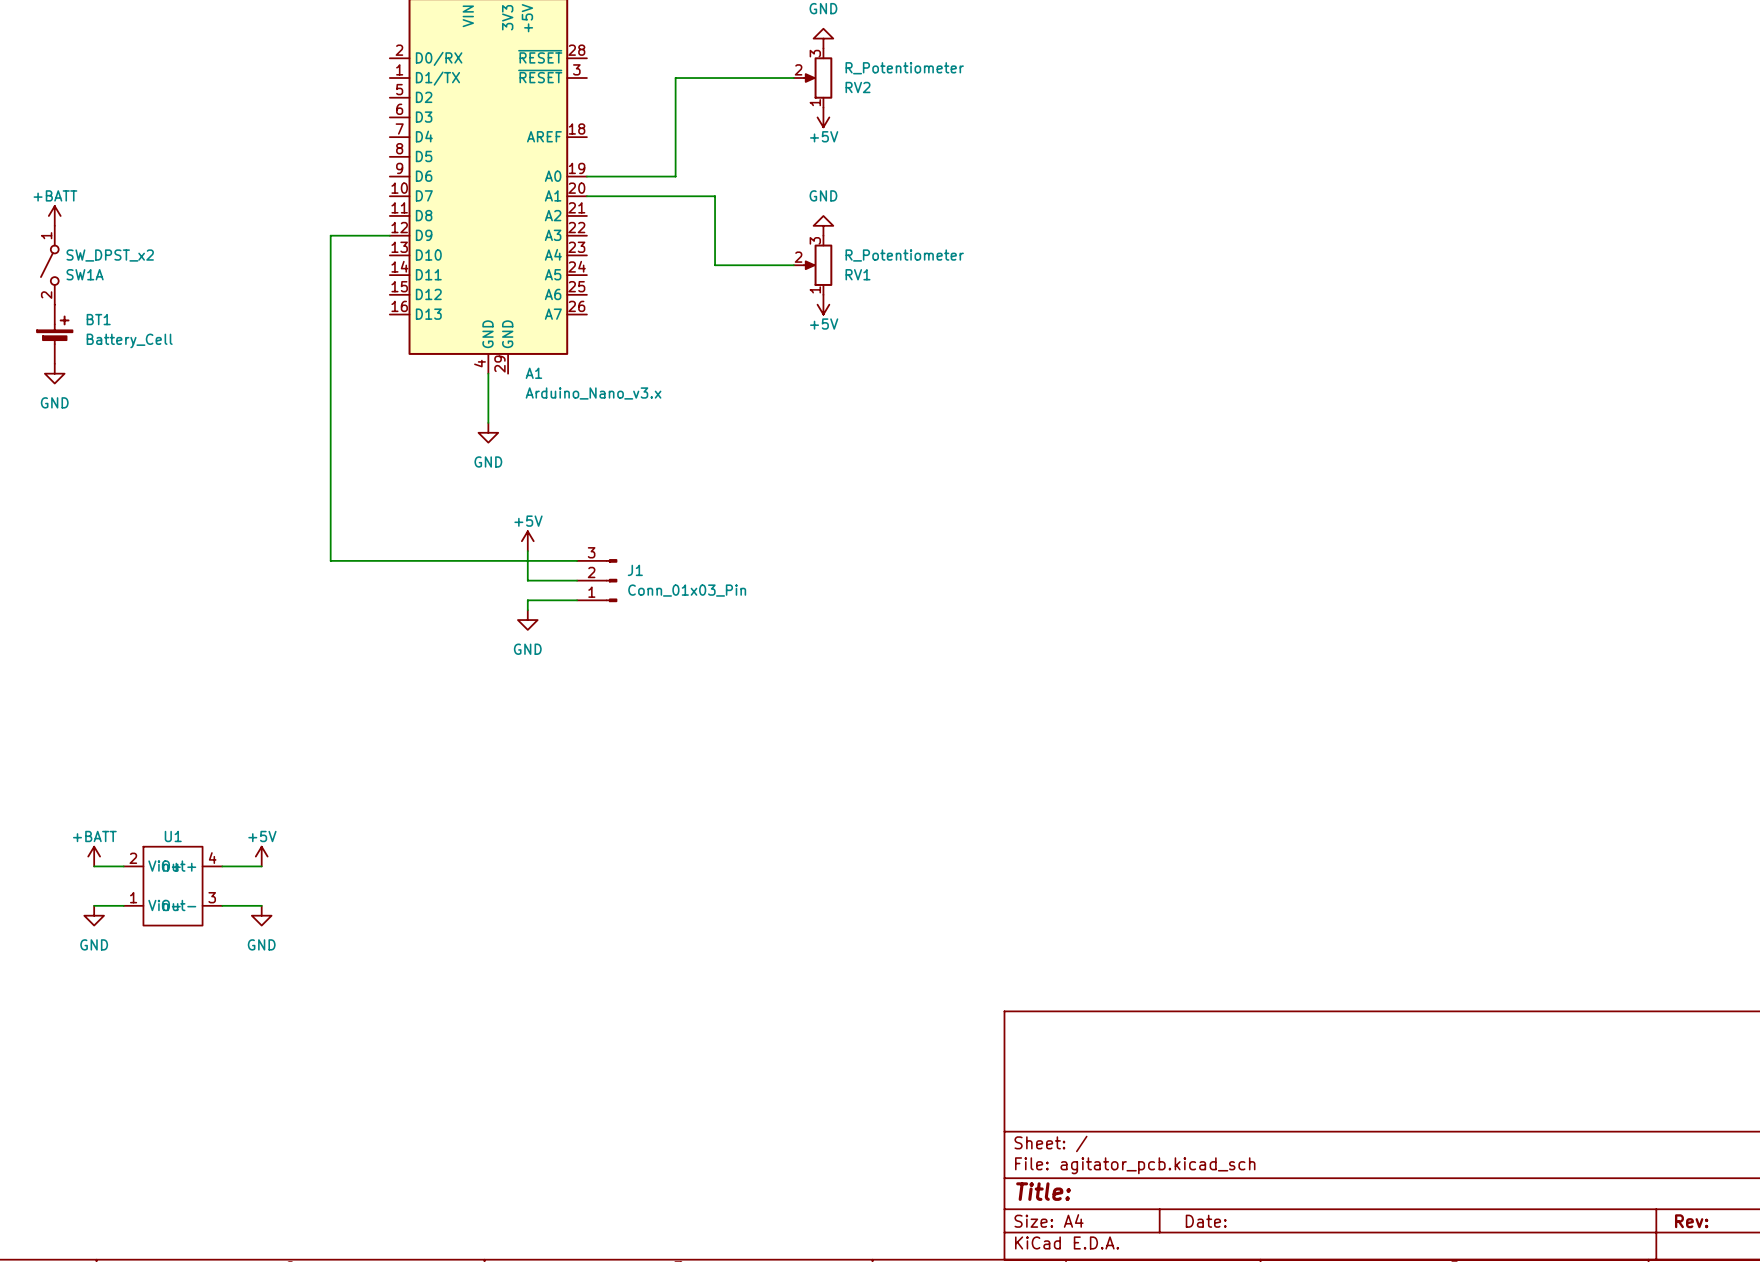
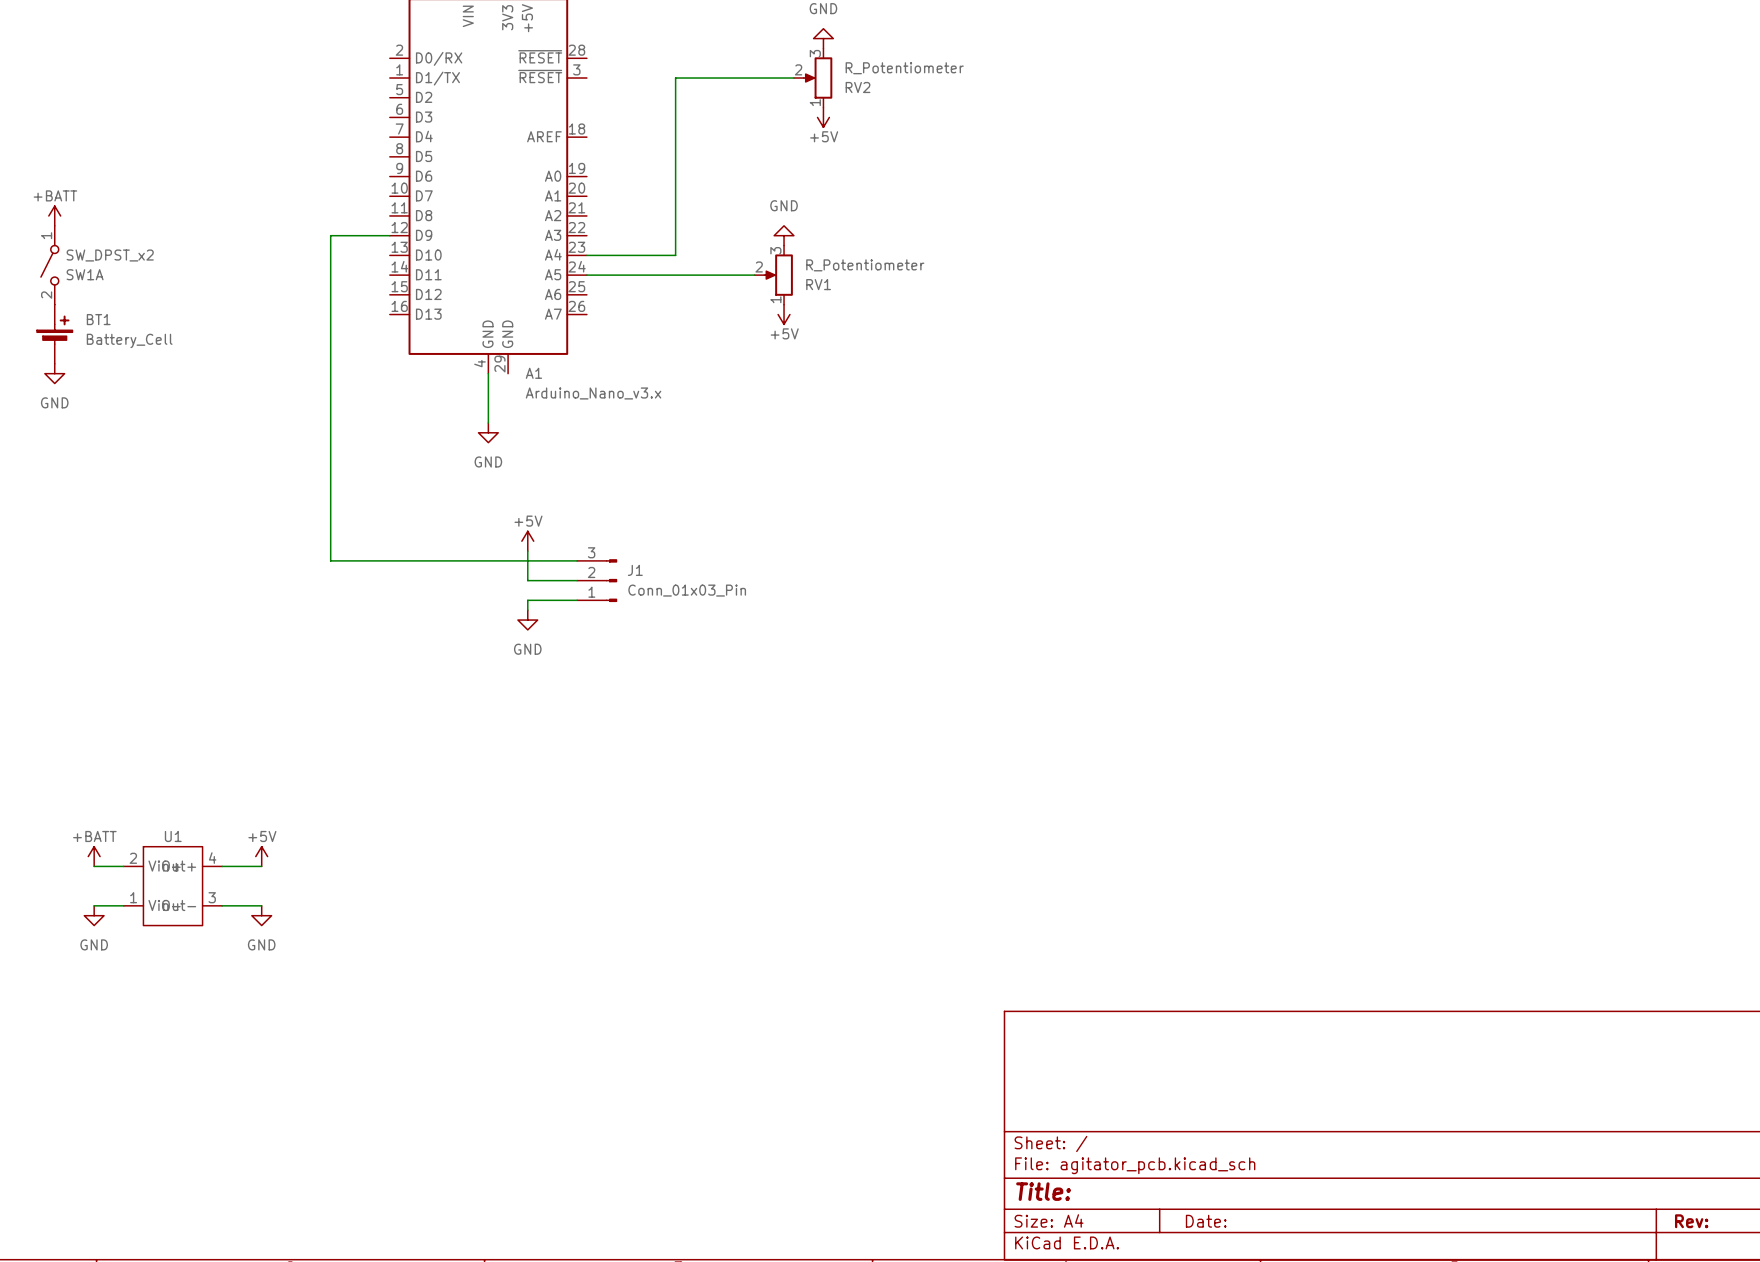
wire: (586, 176) (675, 176) -> (586, 255) (675, 255) (675, 176)
wire: (586, 196) (715, 196) (715, 265) (793, 265) -> none
power symbol position: GND (823, 225) -> GND (784, 235)
RV1 position: (813, 265) -> (773, 275)
wire: none -> (586, 275) (754, 275)
power symbol position: +5V (823, 304) -> +5V (784, 314)

